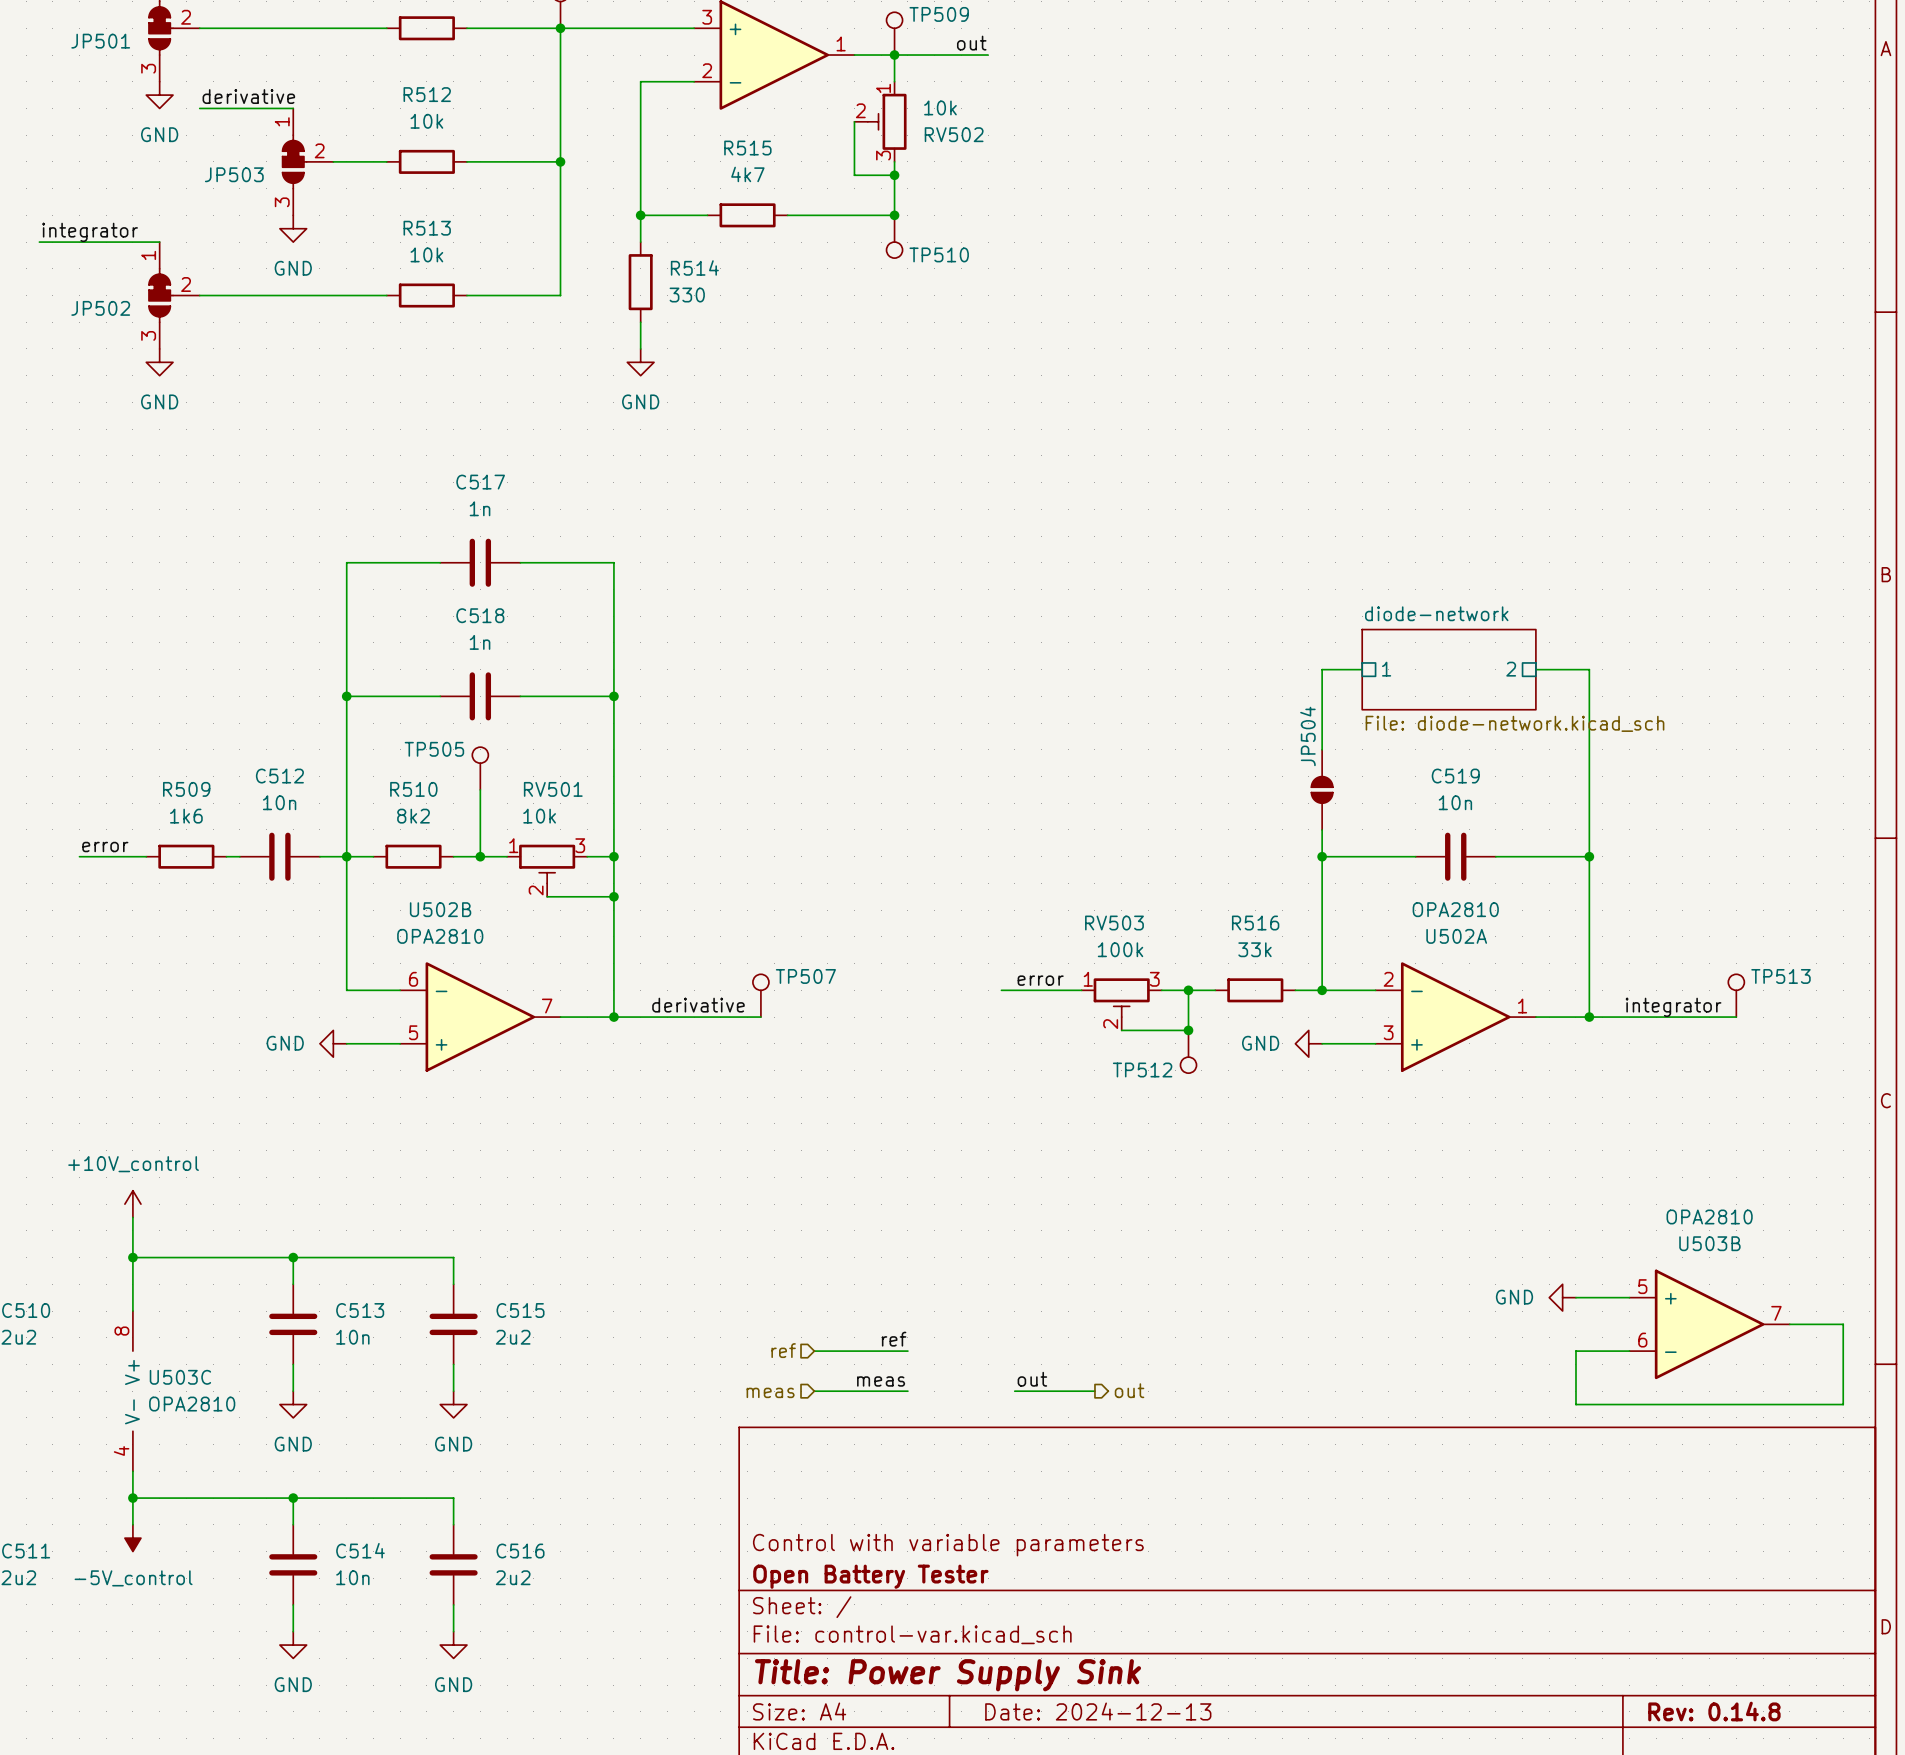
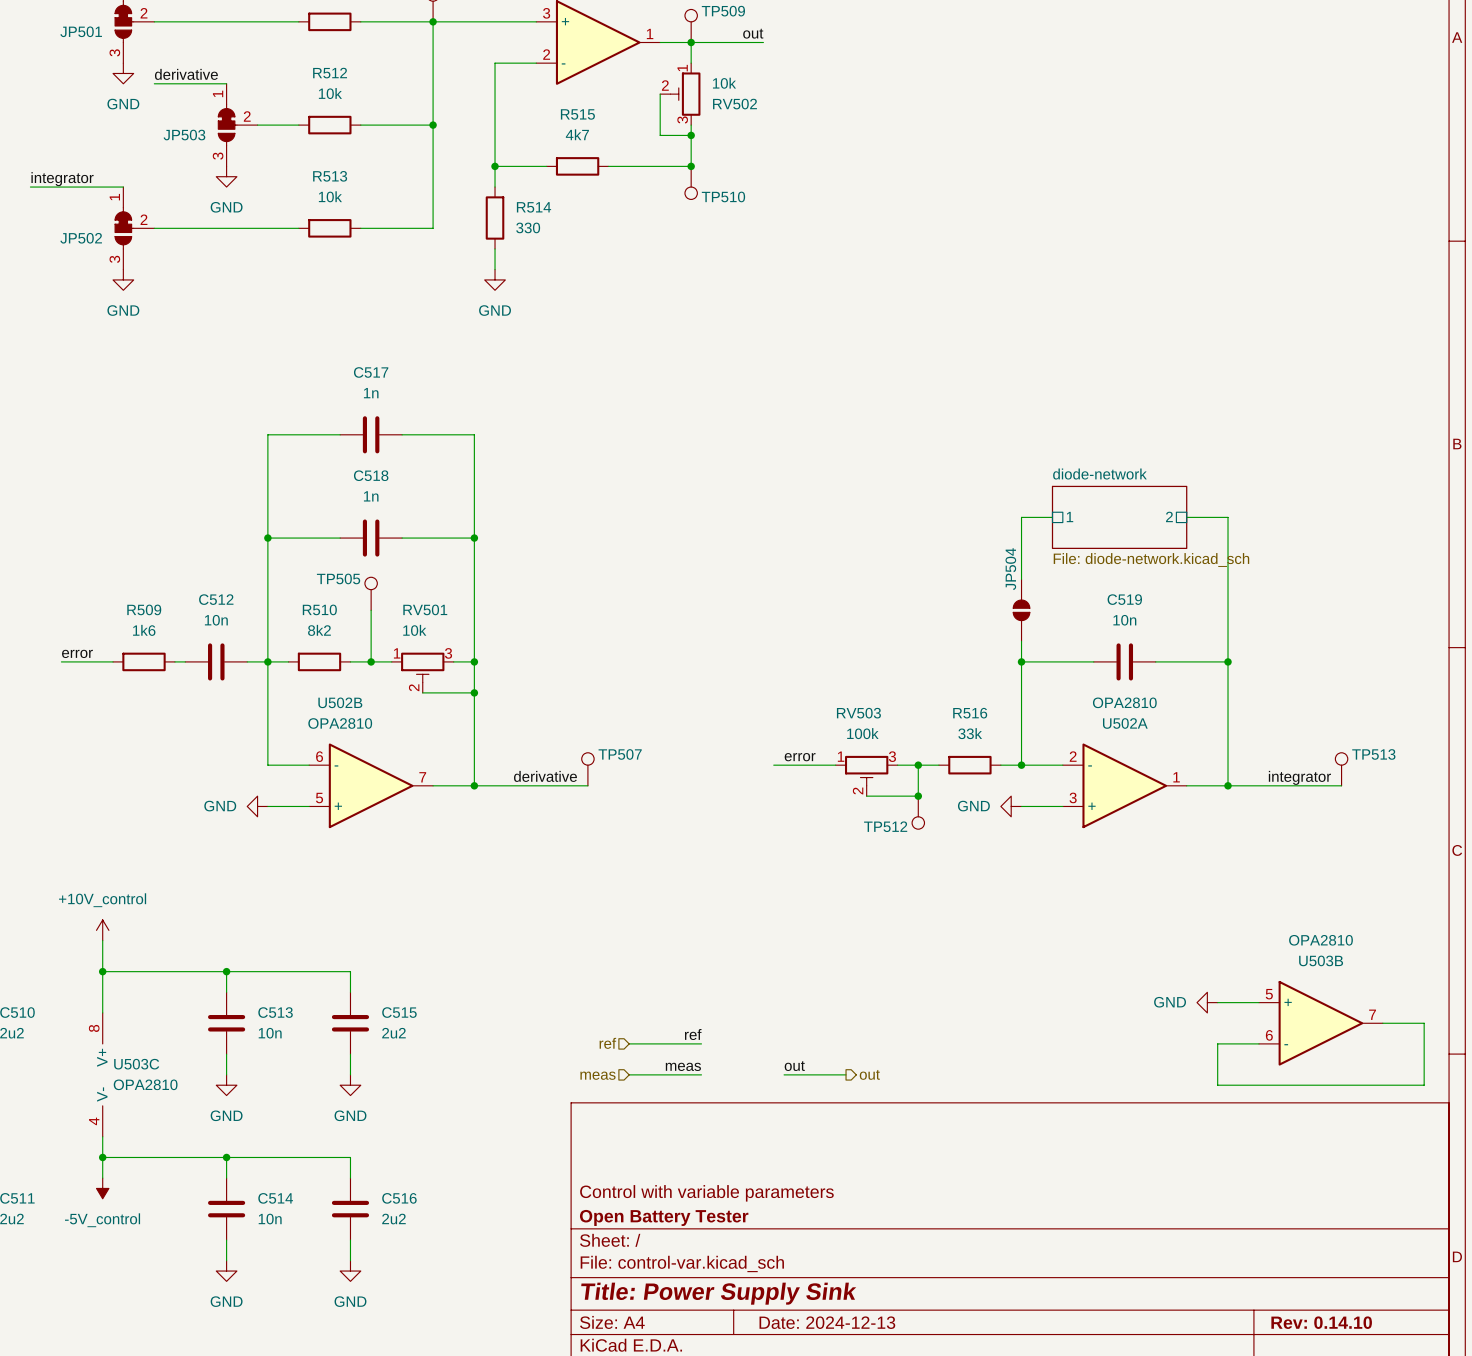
title block: Rev: 0.14.8 (1714, 1711) -> Rev: 0.14.10 (1321, 1322)

